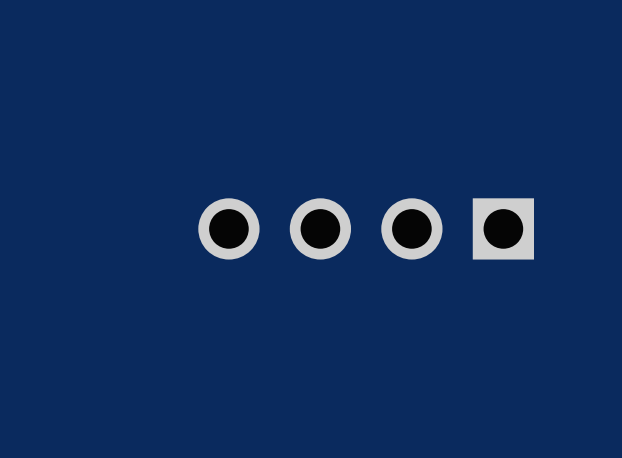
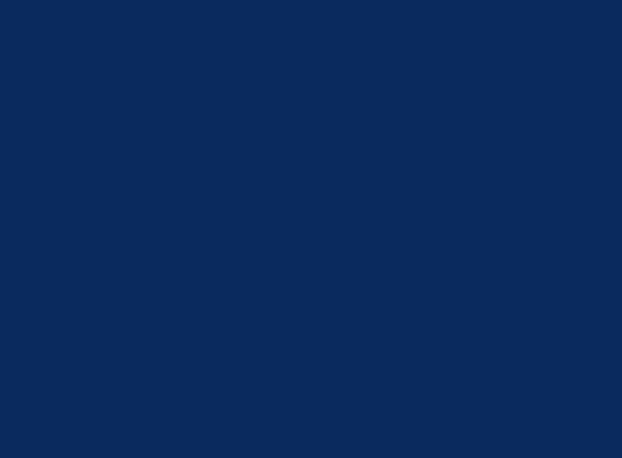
part: (366, 228) -> none

